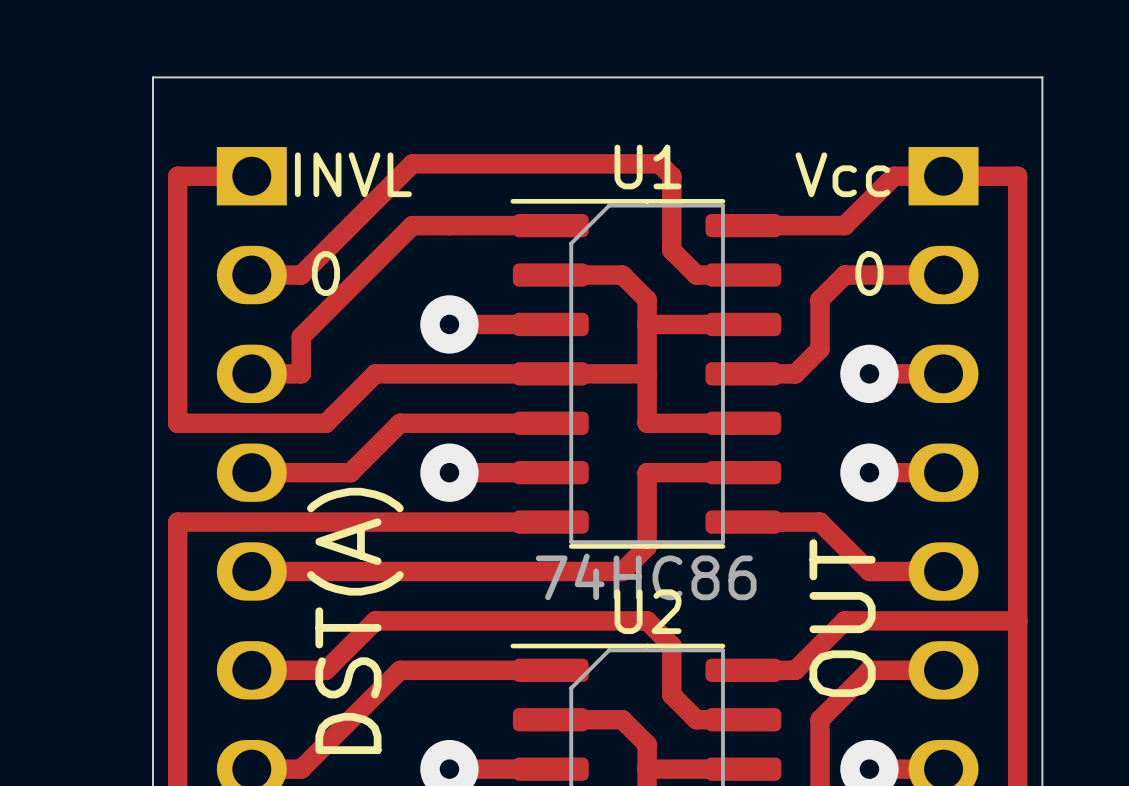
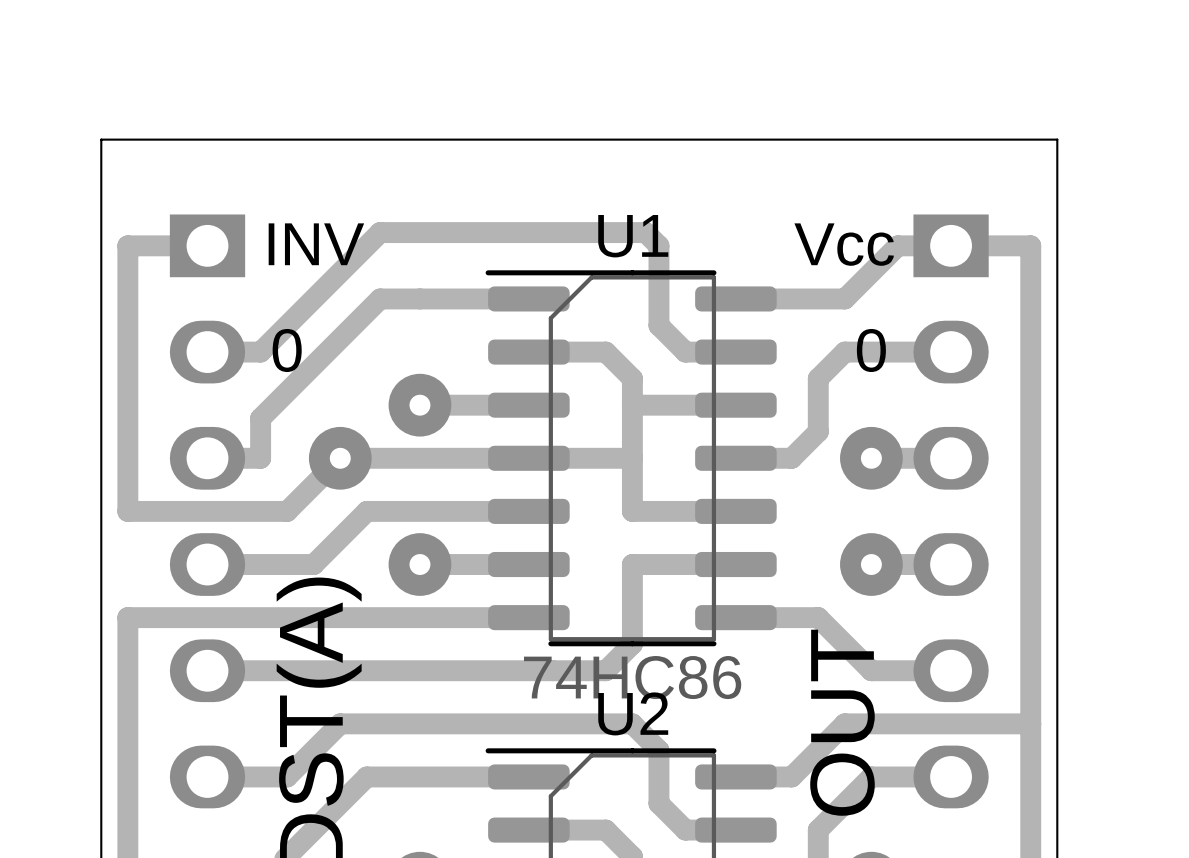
text: INVL (353, 174) -> INV (316, 244)
via: none -> (340, 458)

